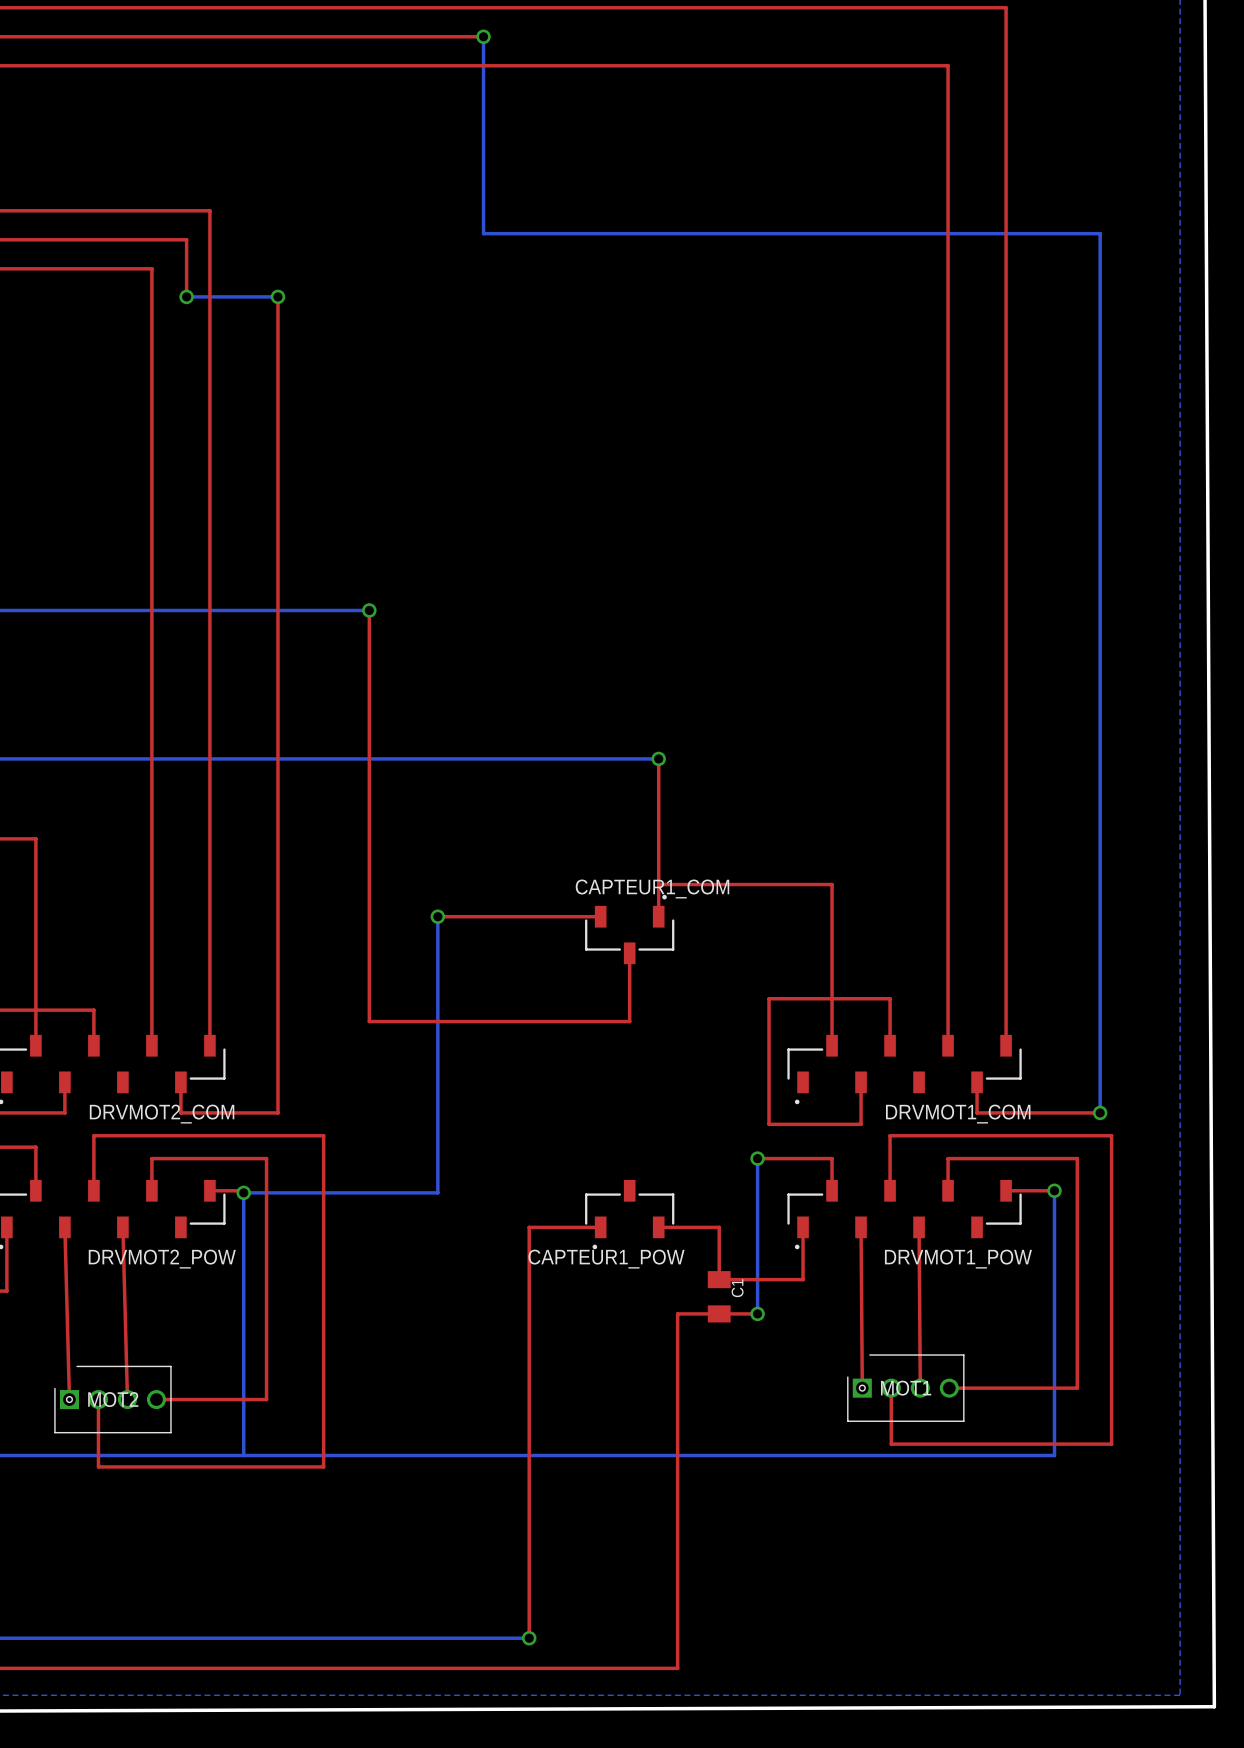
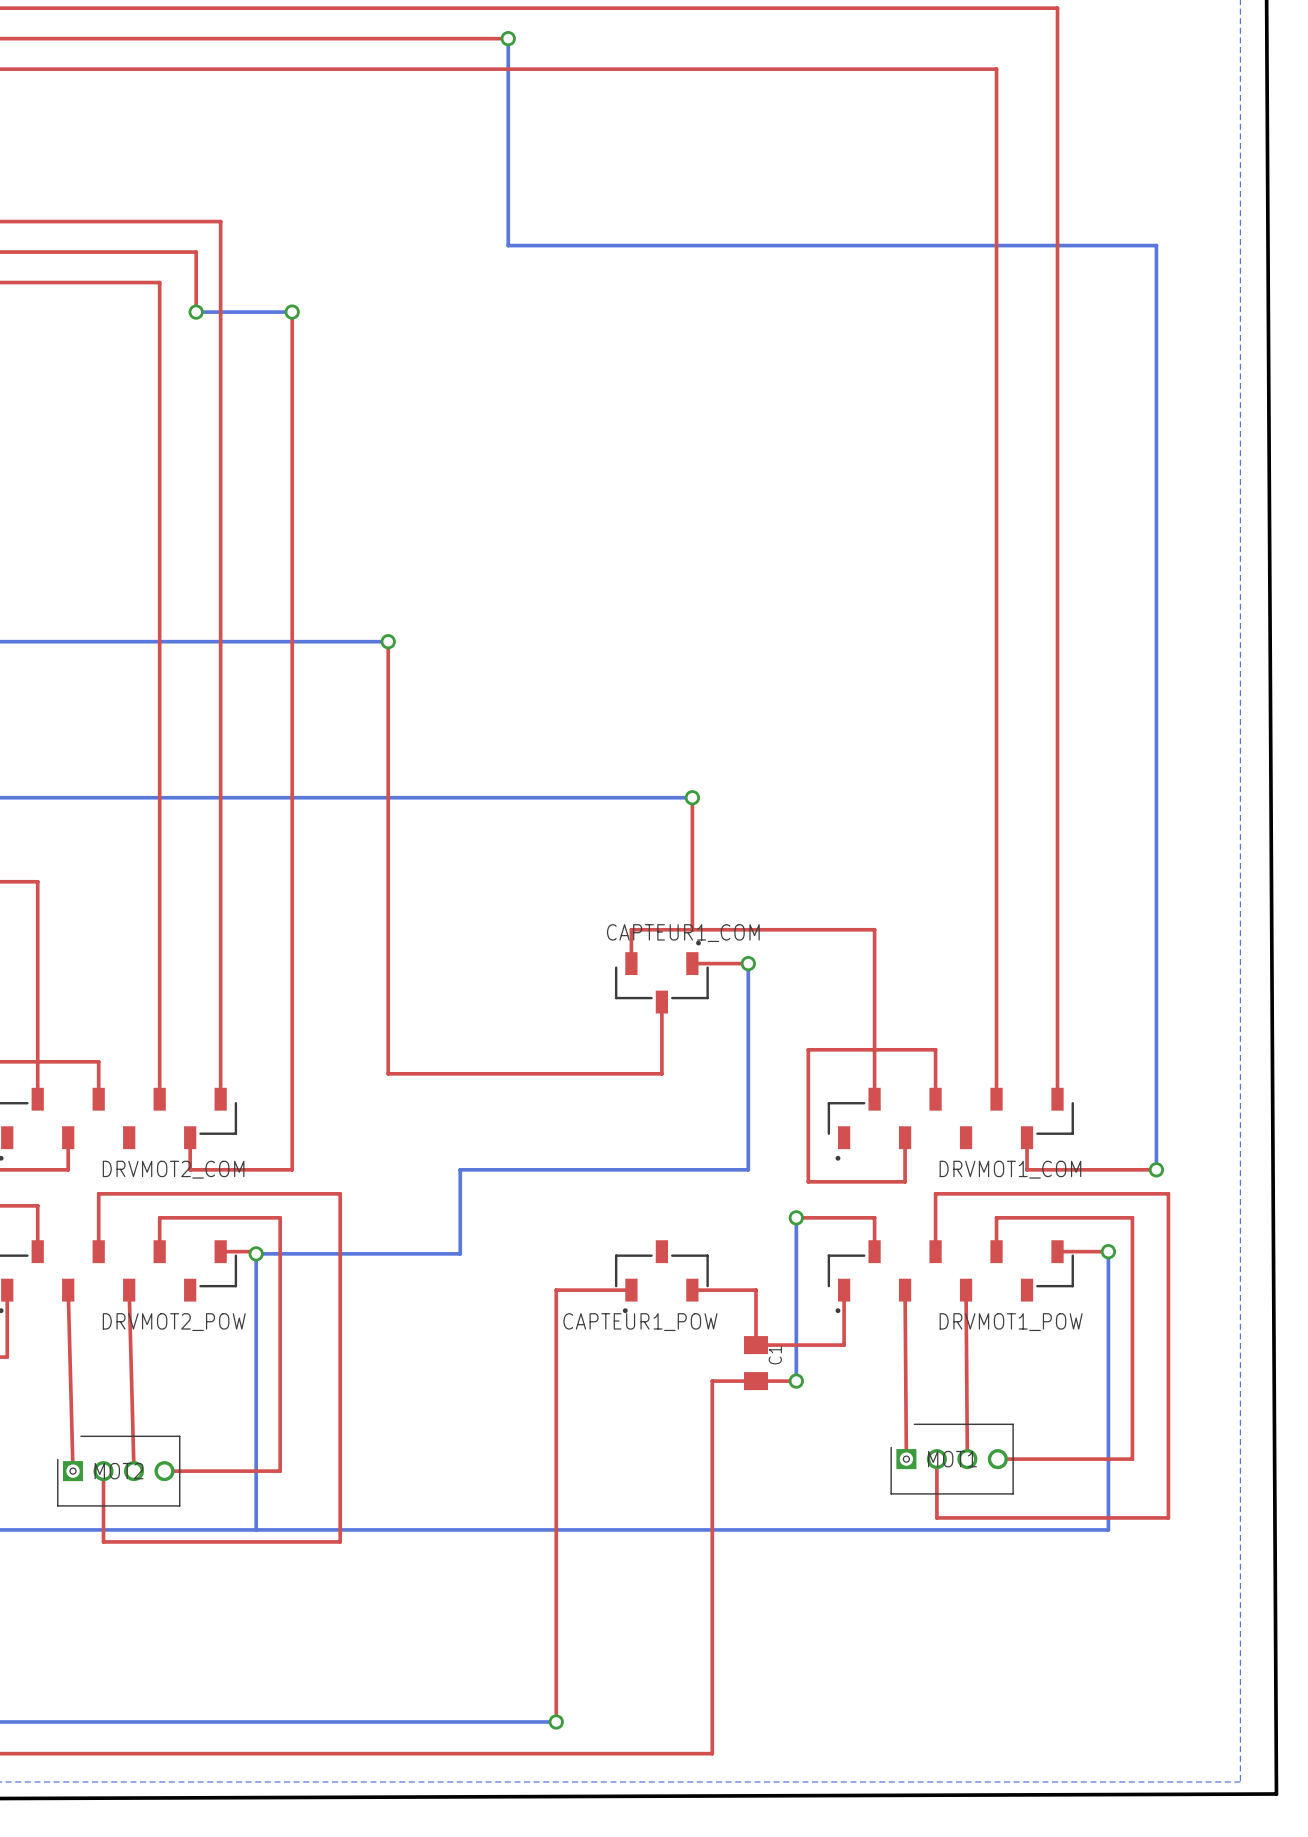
top track: (658, 884) (658, 916) -> (692, 929) (631, 929) (631, 963)
top track: (437, 916) (600, 916) -> none
bottom track: (437, 916) (437, 1112) -> (748, 963) (748, 1169) (460, 1169)
via: (437, 916) -> none
top track: none -> (692, 963) (748, 963)
via: none -> (748, 963)

